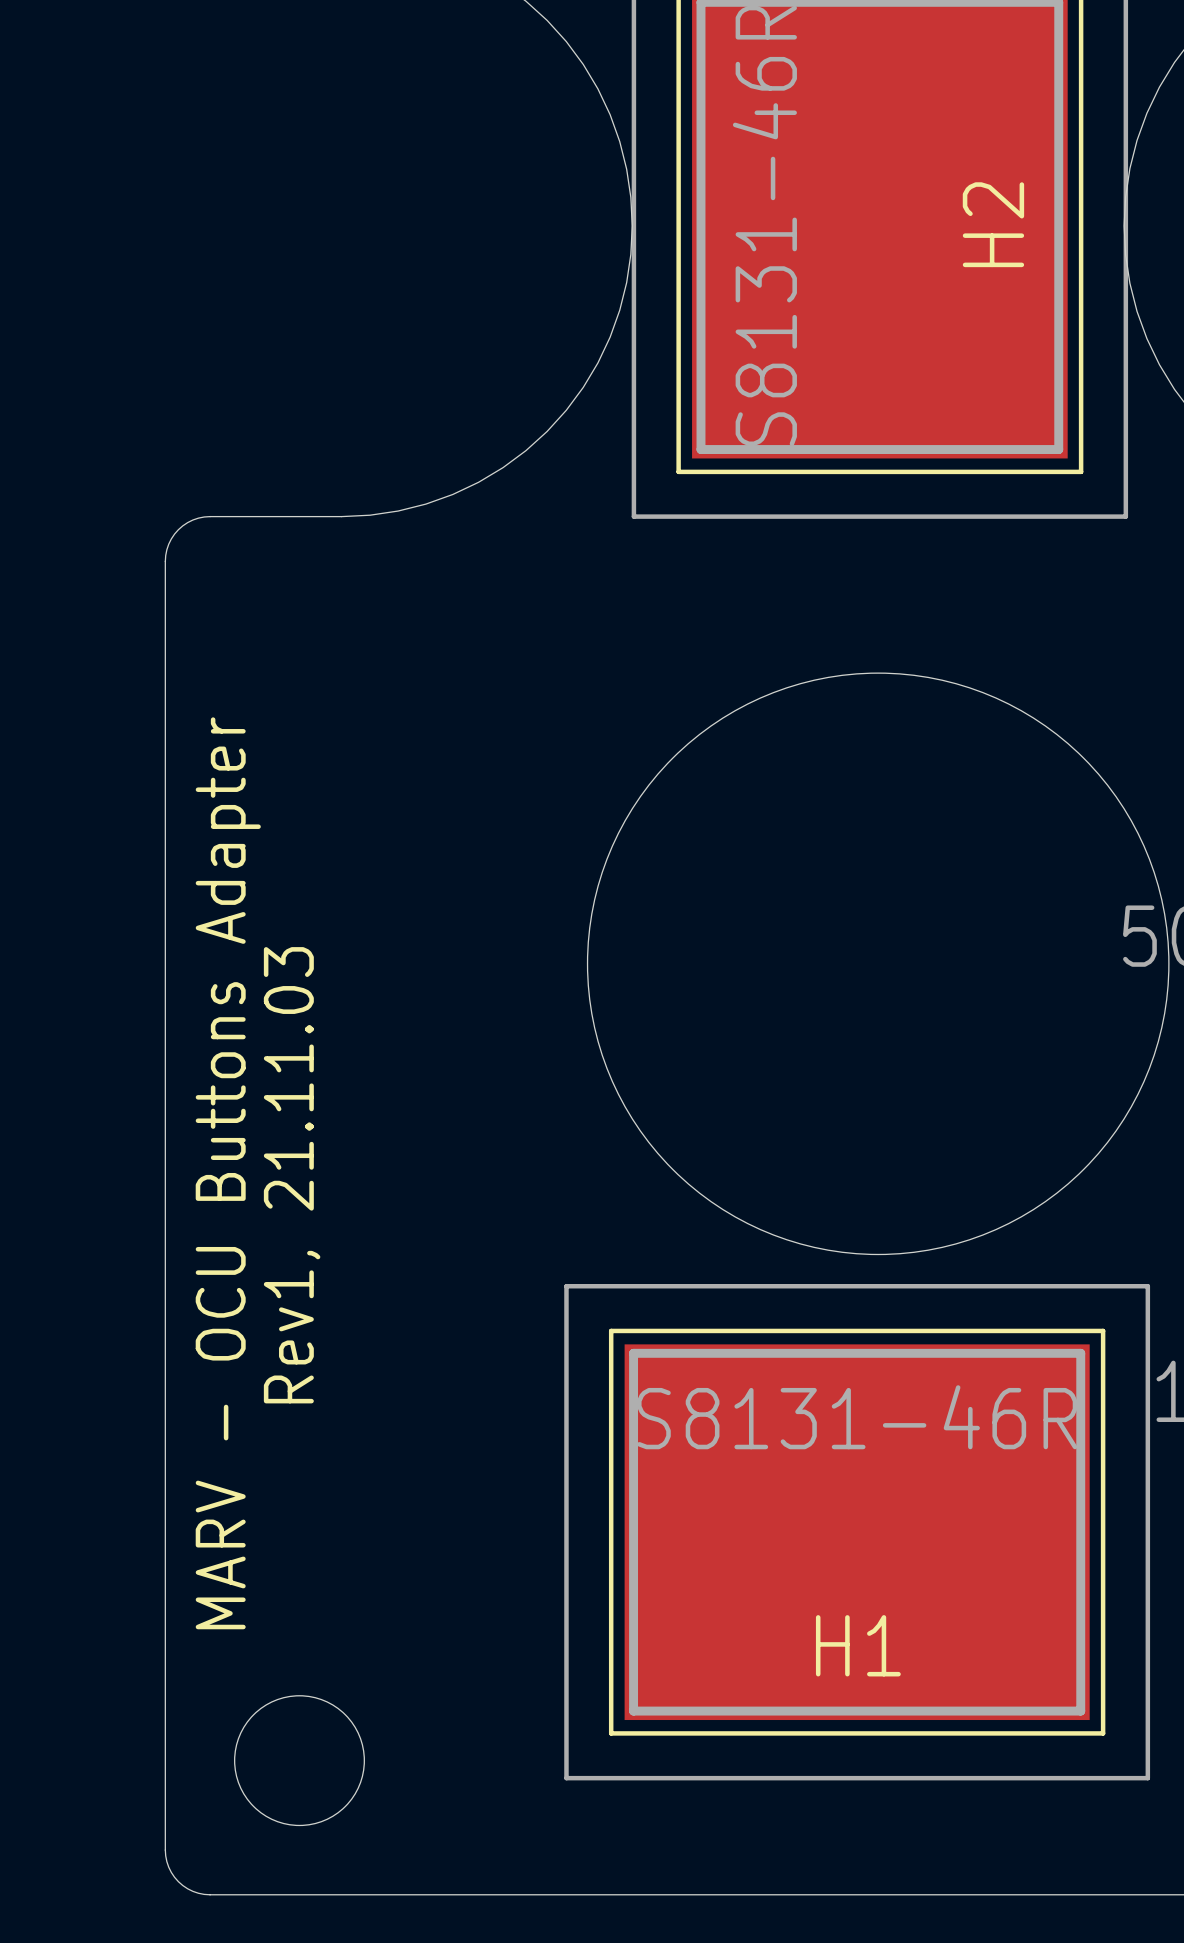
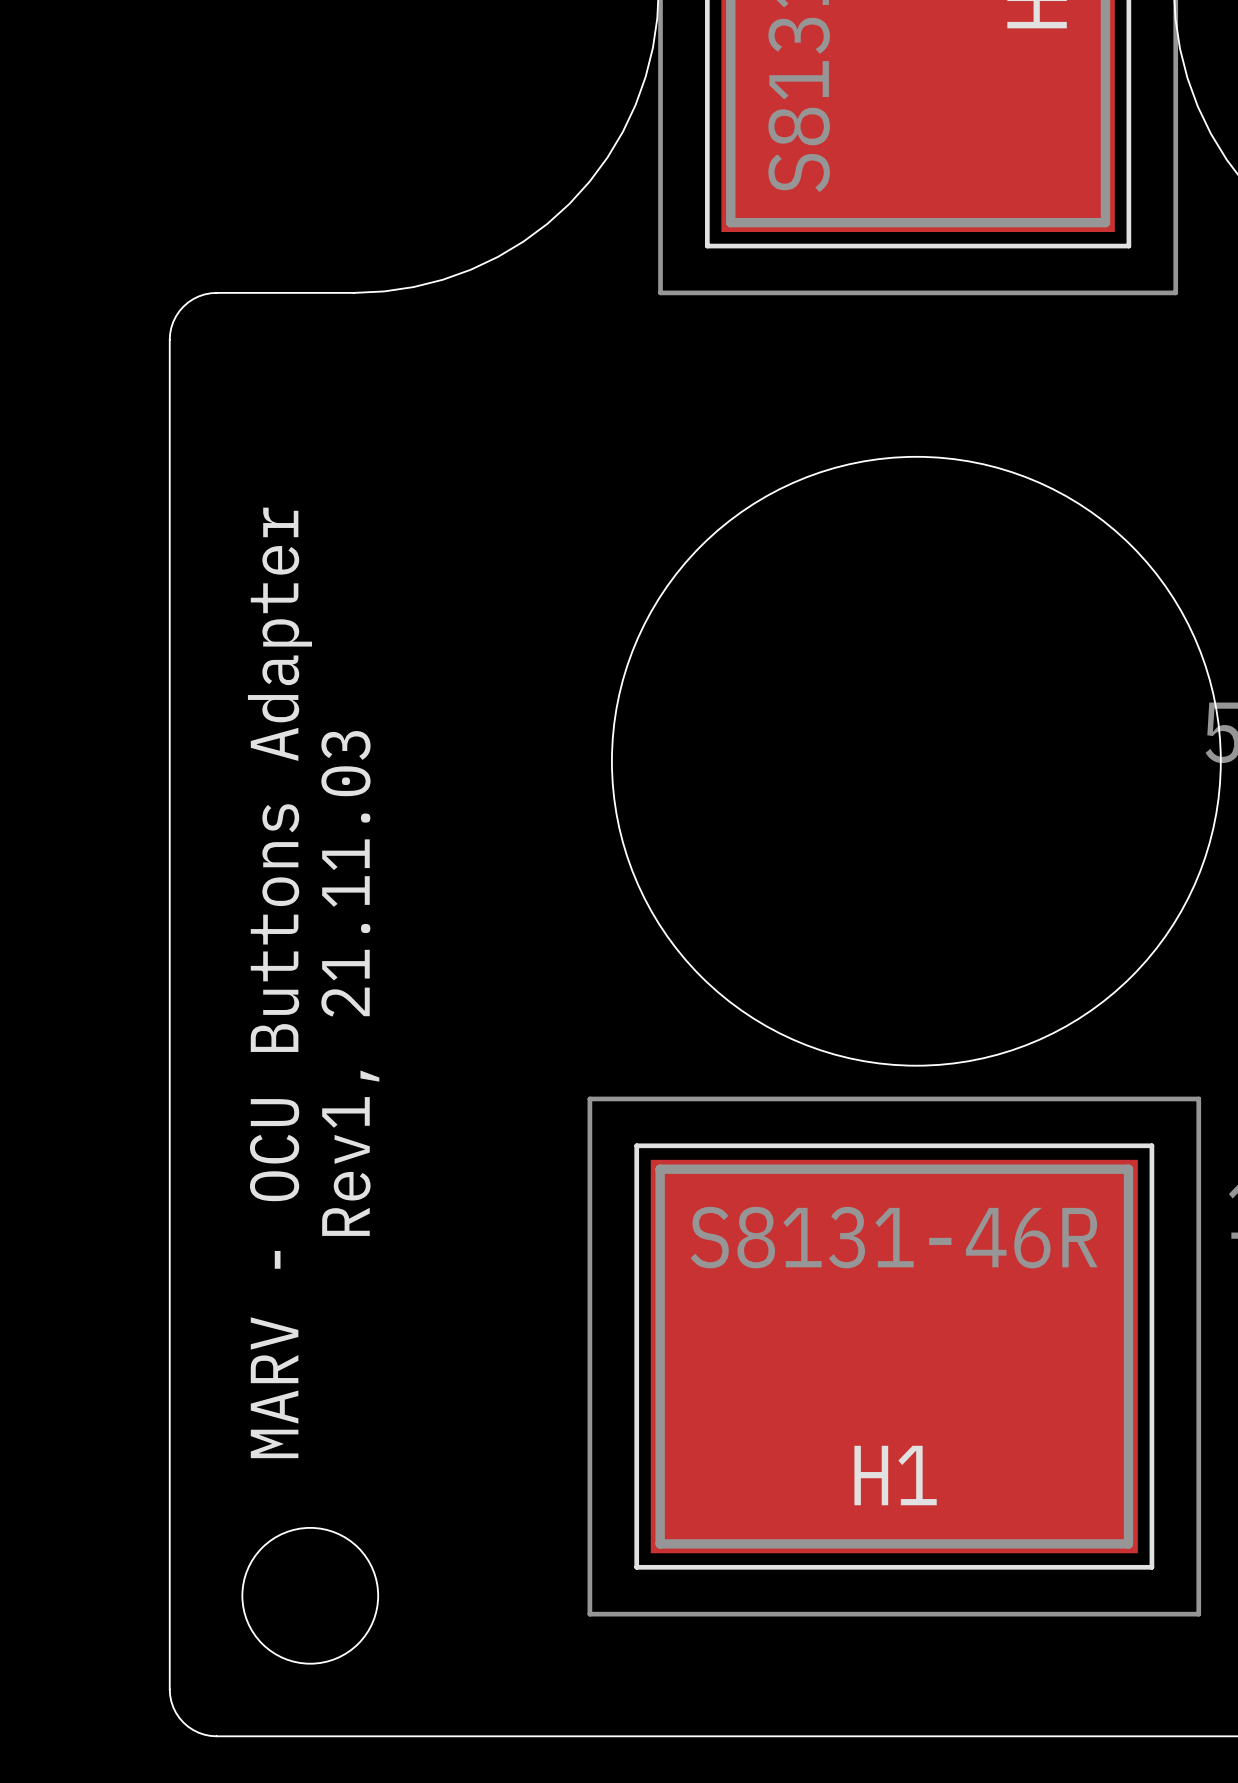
text position: MARV - OCU Buttons Adapter (228, 1173) -> MARV - OCU Buttons Adapter (279, 982)
text position: Rev1, 21.11.03 (292, 1175) -> Rev1, 21.11.03 (350, 983)

